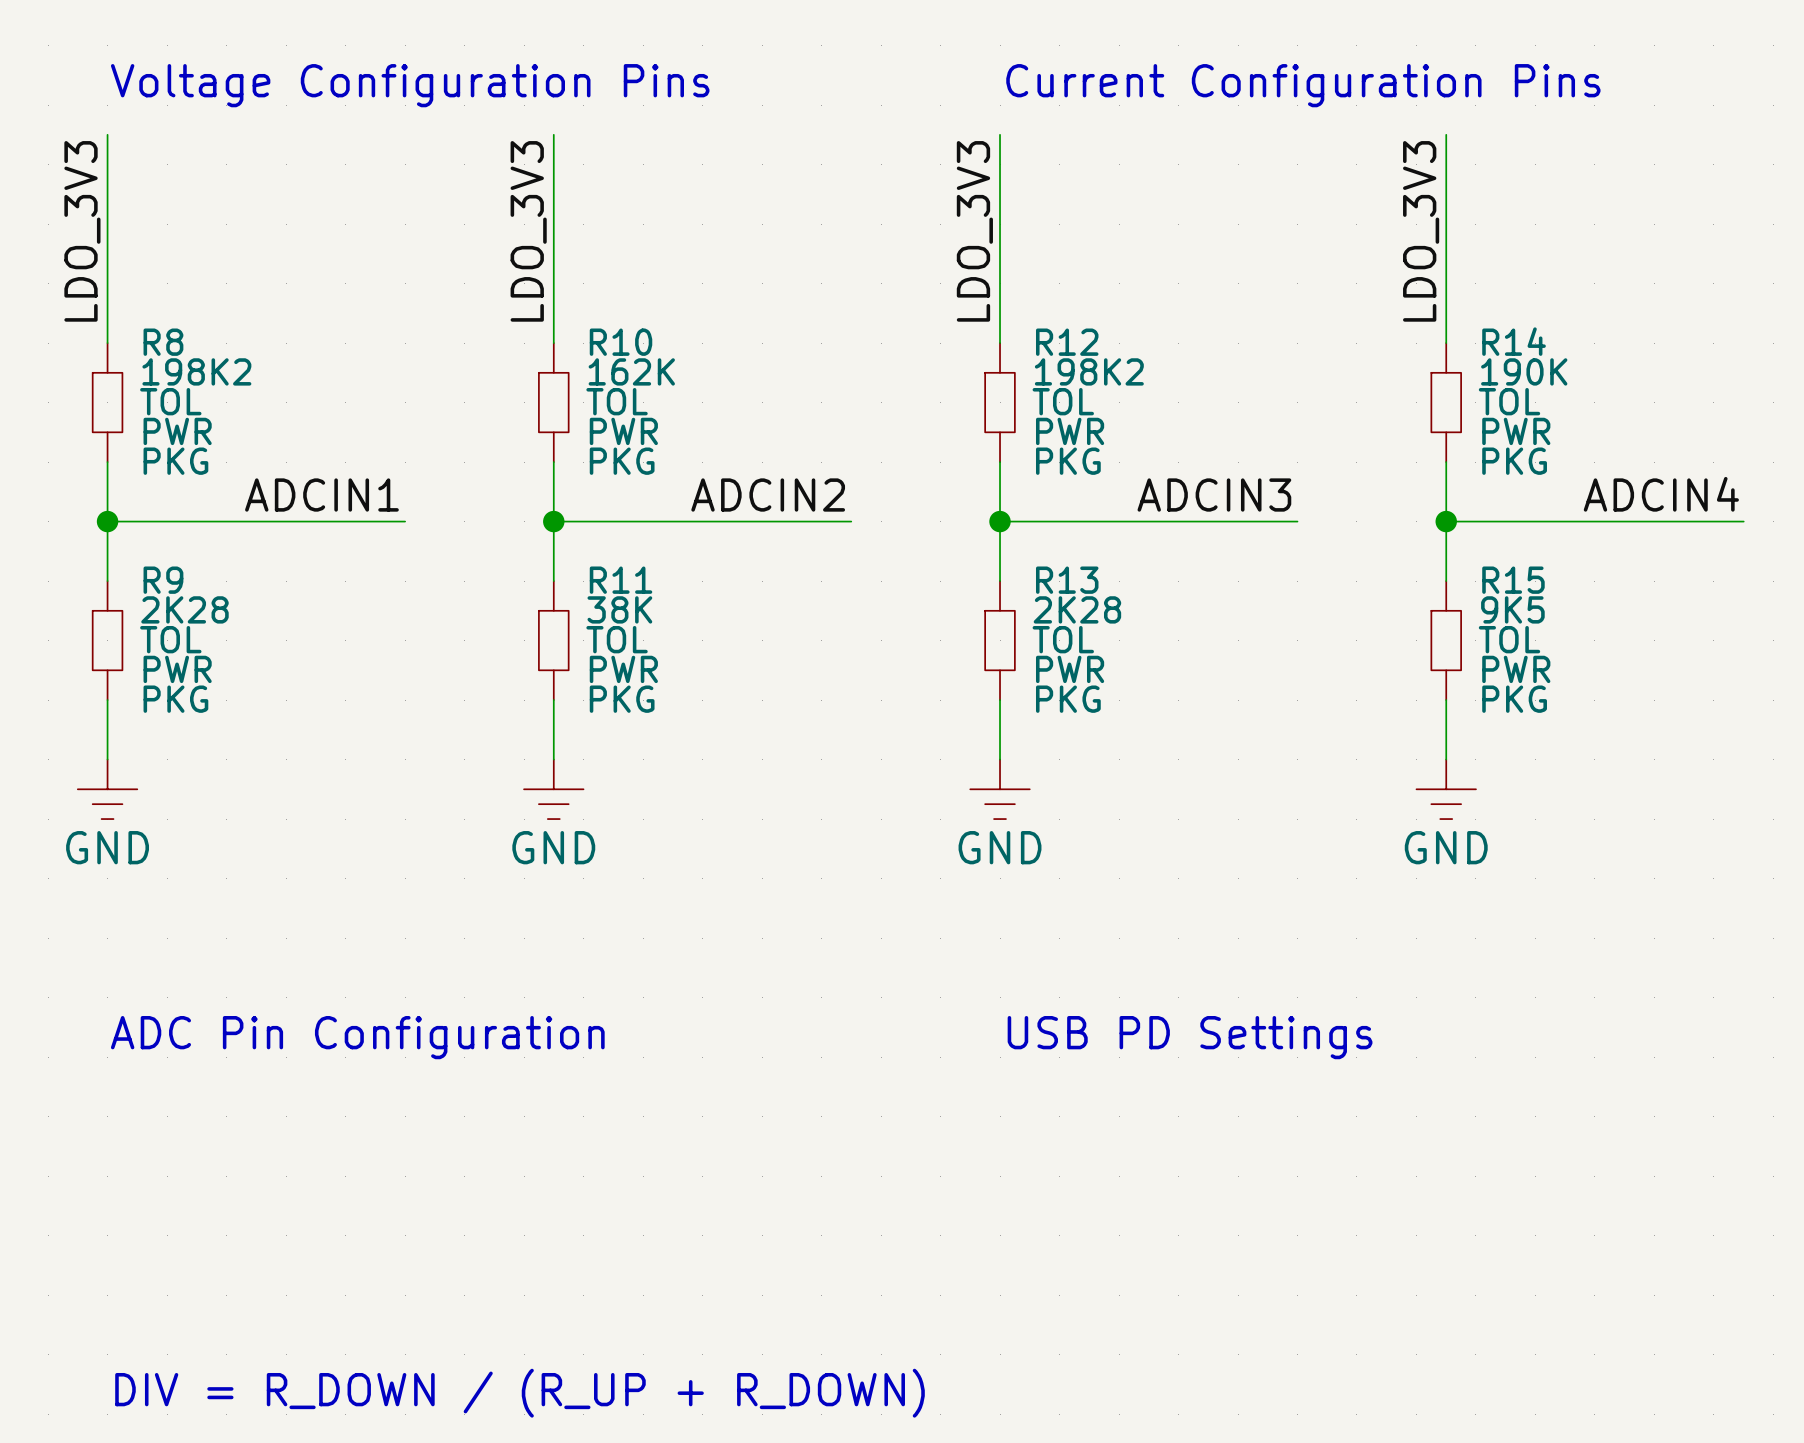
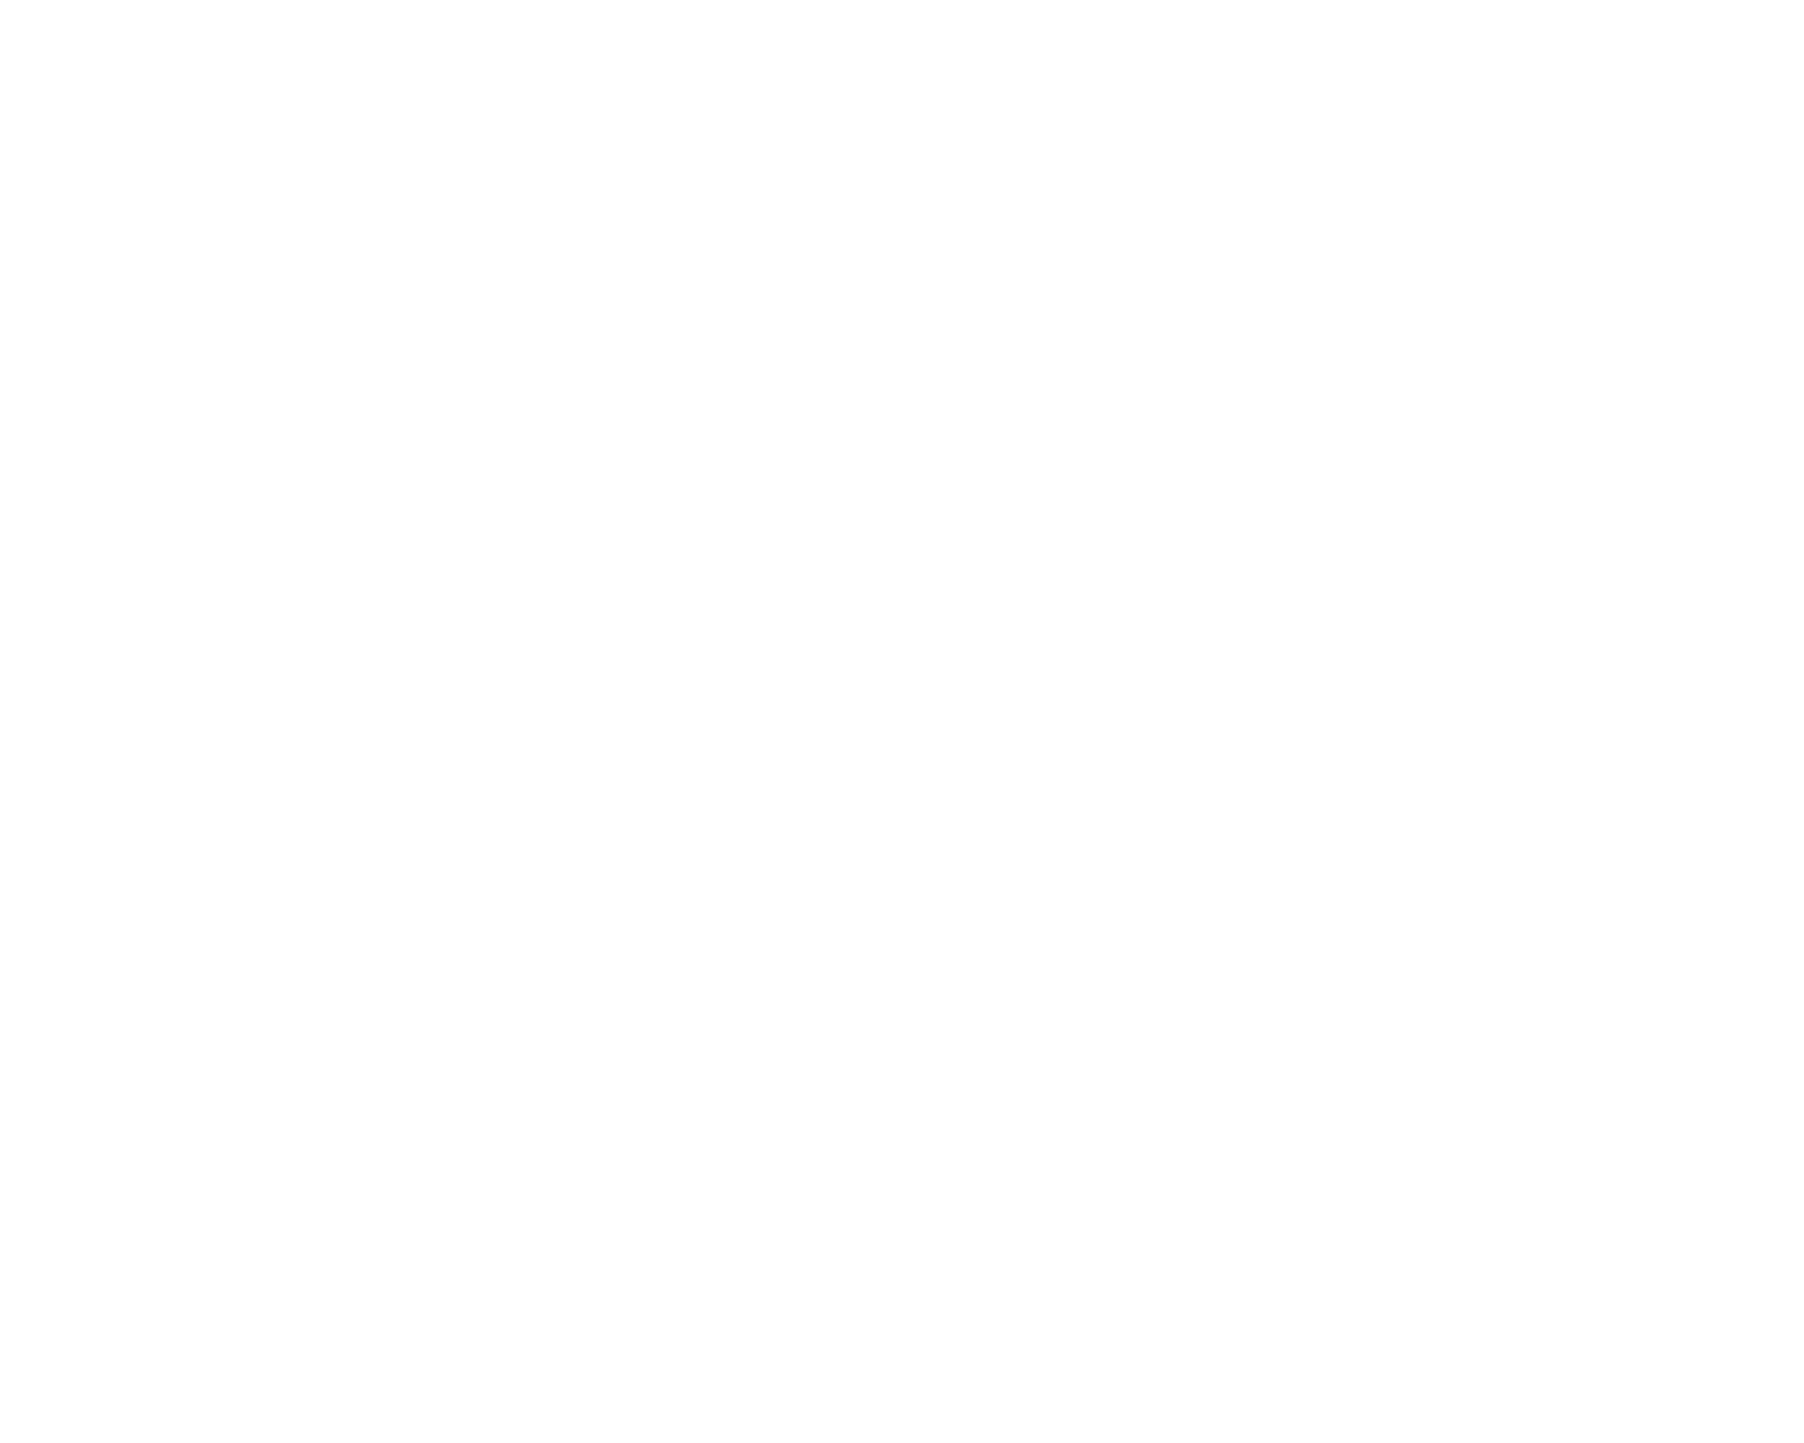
text: Voltage Configuration Pins (410, 85) -> none
text: Current Configuration Pins (1303, 85) -> none
wire: (107, 134) (107, 343) -> none
wire: (553, 134) (553, 343) -> none
wire: (1000, 134) (1000, 343) -> none
wire: (1446, 134) (1446, 343) -> none
label: LDO_3V3 (82, 231) -> none
label: LDO_3V3 (528, 231) -> none
label: LDO_3V3 (974, 231) -> none
label: LDO_3V3 (1421, 231) -> none
R8: 198K2 (107, 402) -> none
R10: 162K (553, 402) -> none
R12: 198K2 (1000, 402) -> none
R14: 190K (1446, 402) -> none
wire: (107, 462) (107, 581) -> none
wire: (553, 462) (553, 581) -> none
wire: (1000, 462) (1000, 581) -> none
wire: (1446, 462) (1446, 581) -> none
label: ADCIN4 (1661, 494) -> none
label: ADCIN1 (321, 495) -> none
label: ADCIN2 (768, 495) -> none
label: ADCIN3 (1214, 495) -> none
wire: (107, 521) (405, 521) -> none
junction: (107, 521) -> none
wire: (553, 521) (851, 521) -> none
junction: (553, 521) -> none
wire: (1000, 521) (1297, 521) -> none
junction: (1000, 521) -> none
wire: (1446, 521) (1743, 521) -> none
junction: (1446, 521) -> none
R9: 2K28 (107, 640) -> none
R11: 38K (553, 640) -> none
R13: 2K28 (1000, 640) -> none
R15: 9K5 (1446, 640) -> none
wire: (107, 700) (107, 759) -> none
wire: (553, 700) (553, 759) -> none
wire: (1000, 700) (1000, 759) -> none
wire: (1446, 700) (1446, 759) -> none
power symbol: GND (107, 789) -> none
power symbol: GND (553, 789) -> none
power symbol: GND (1000, 789) -> none
power symbol: GND (1446, 789) -> none
text: ADC Pin Configuration (357, 1037) -> none
text: USB PD Settings (1190, 1037) -> none
text: DIV = R_DOWN / (R_UP + R_DOWN) (520, 1393) -> none

